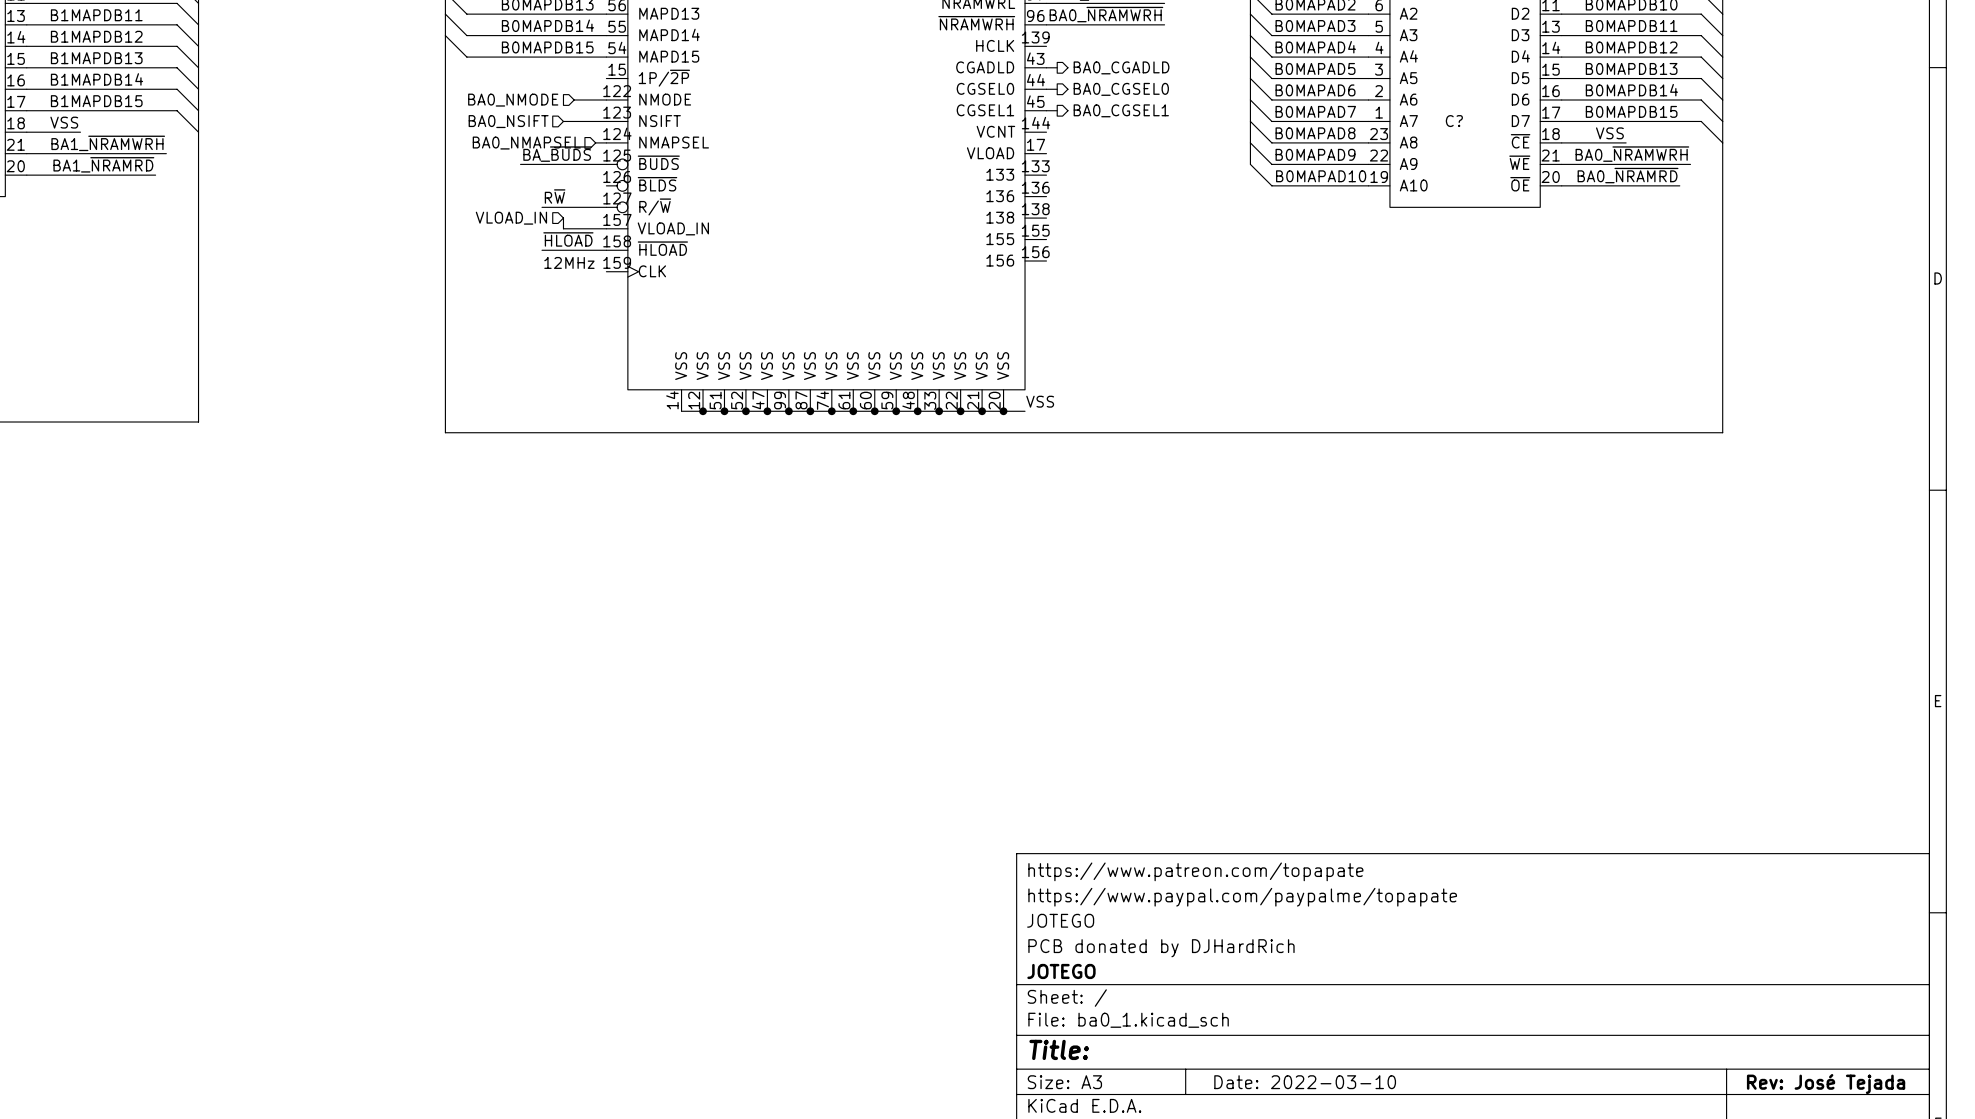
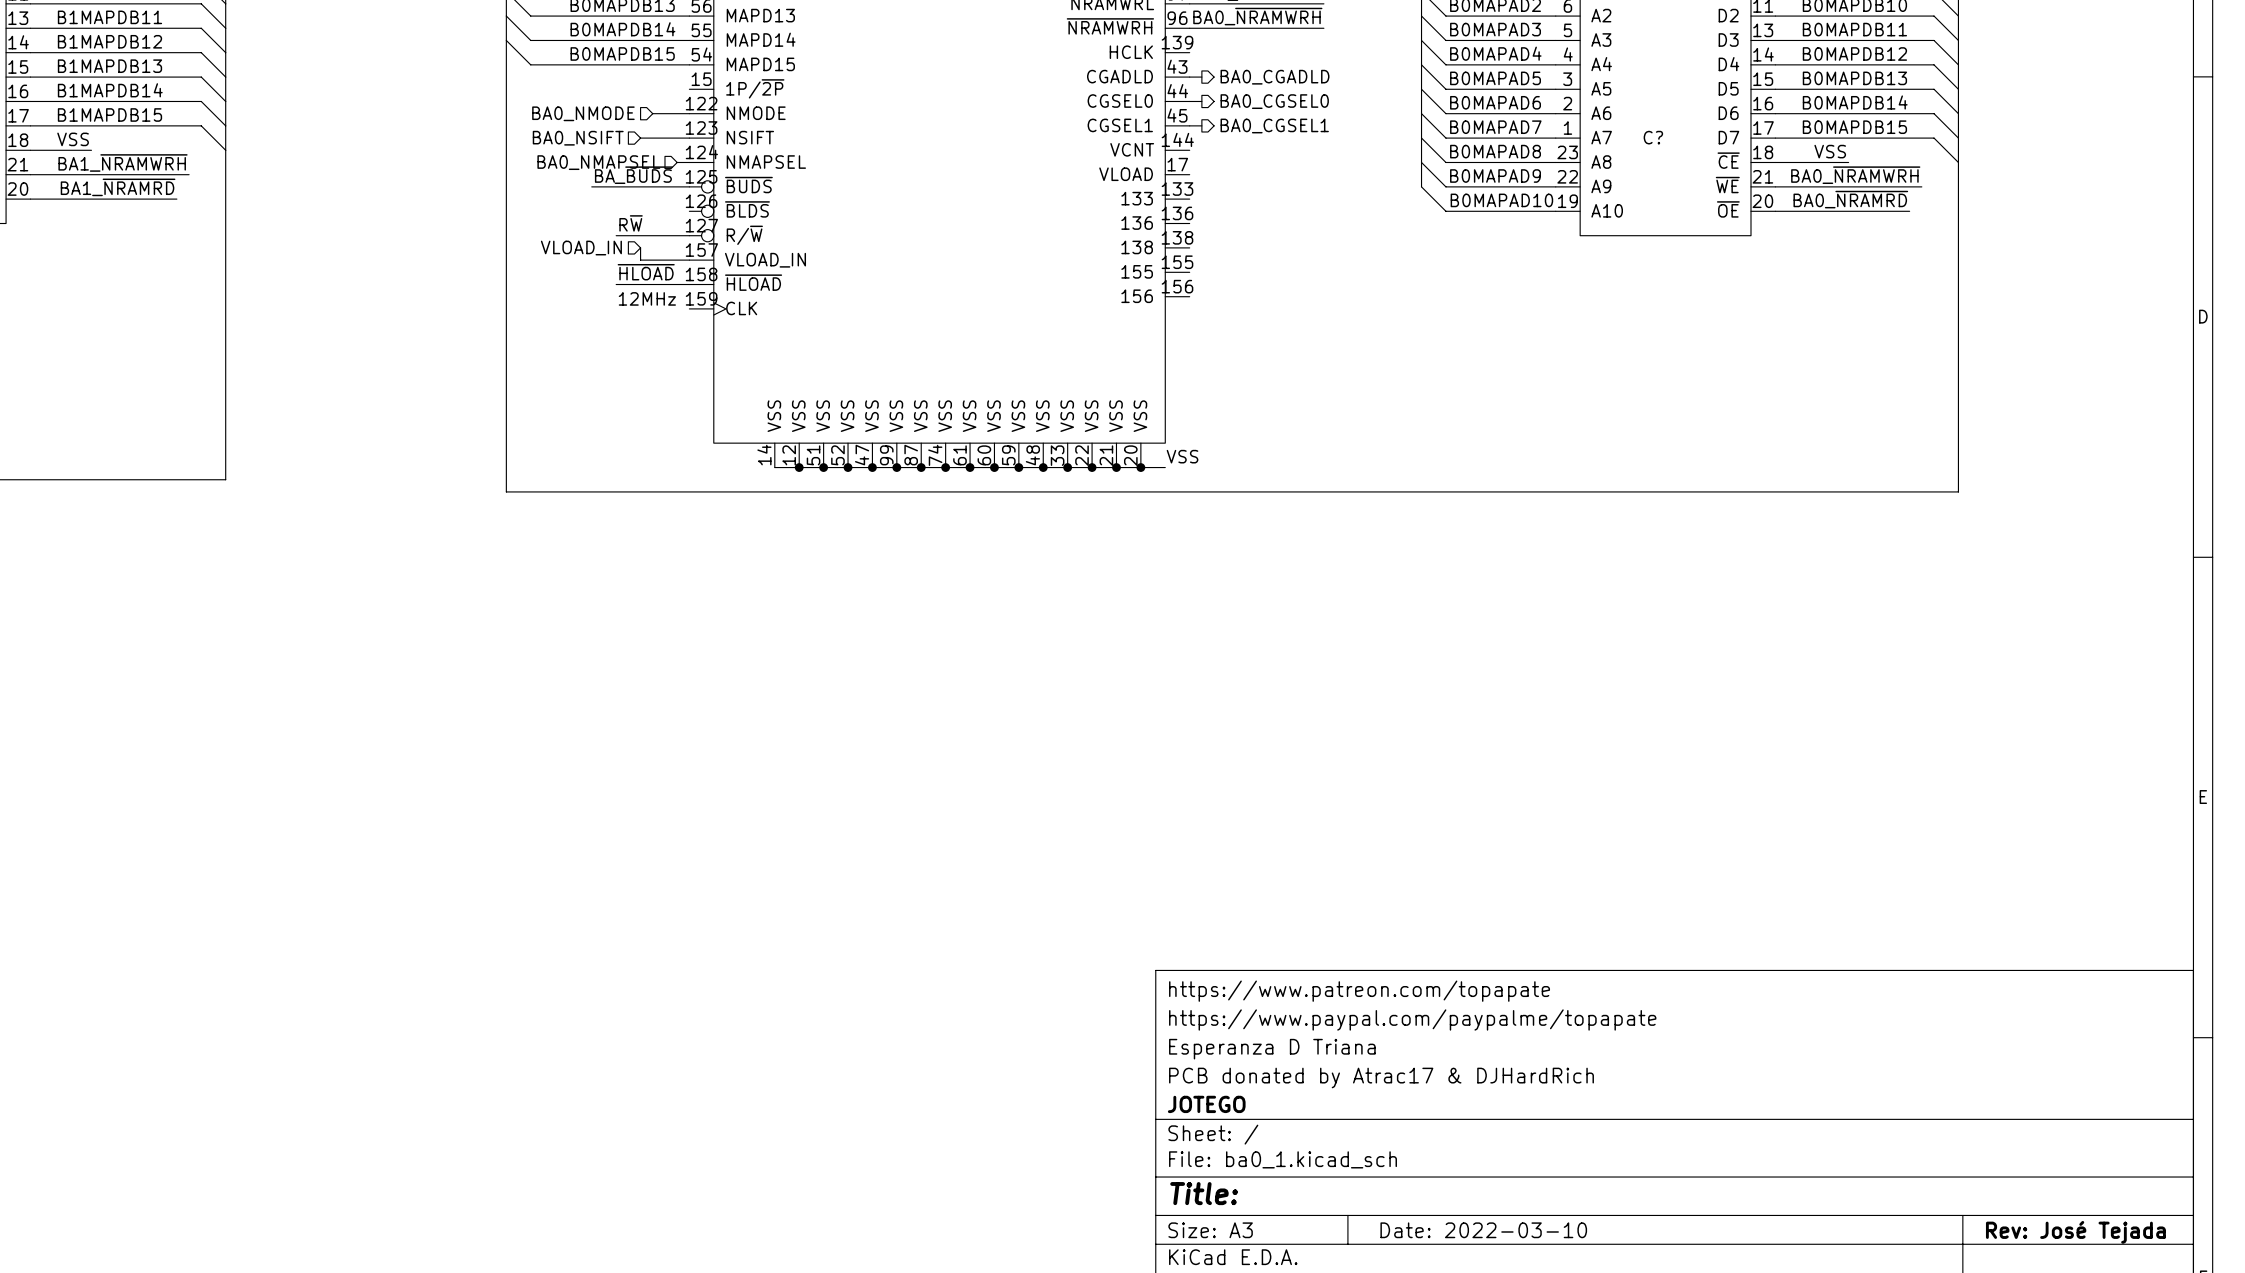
title block: JOTEGO (1060, 920) -> Esperanza D Triana (1272, 1049)
title block: PCB donated by DJHardRich (1161, 948) -> PCB donated by Atrac17 & DJHardRich (1381, 1077)

